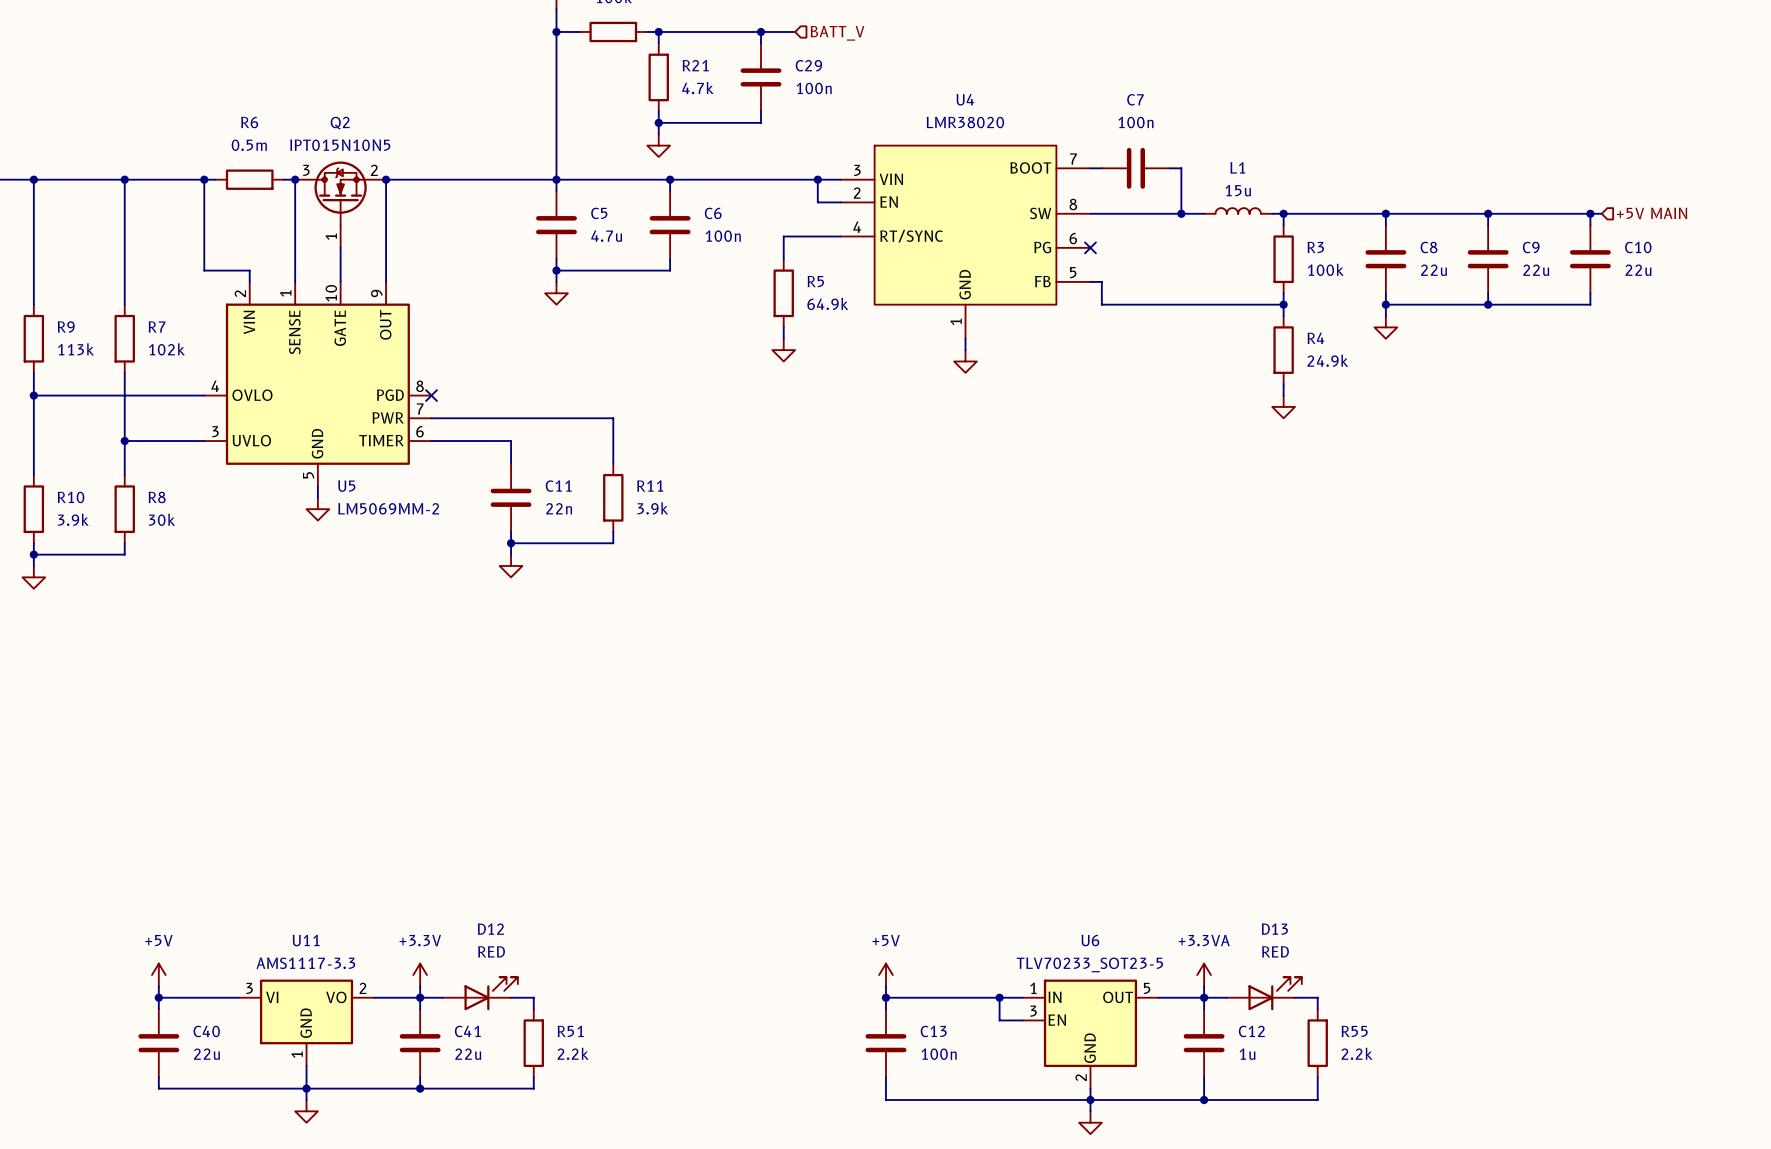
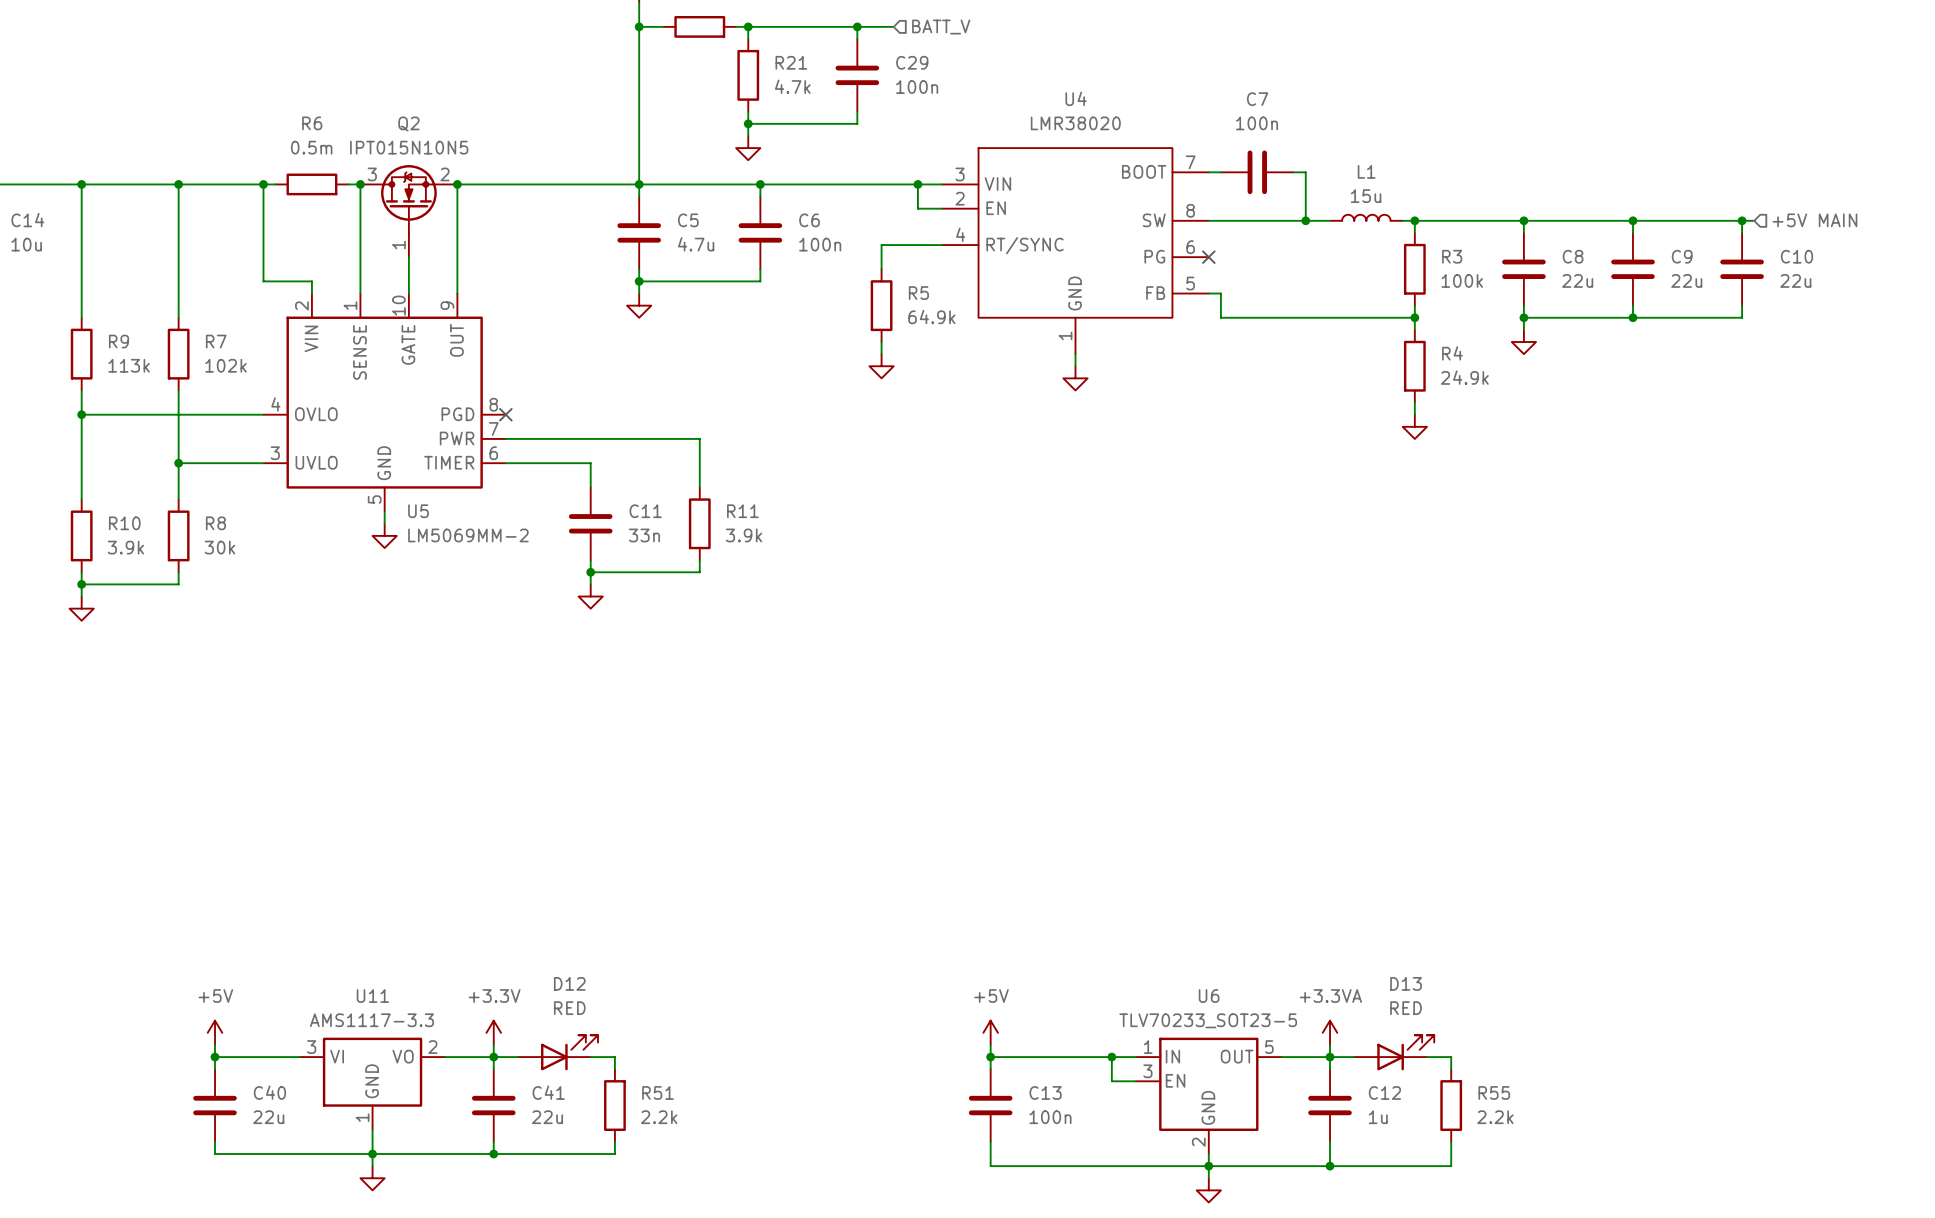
C11 value: 22n (559, 508) -> 33n (644, 535)

